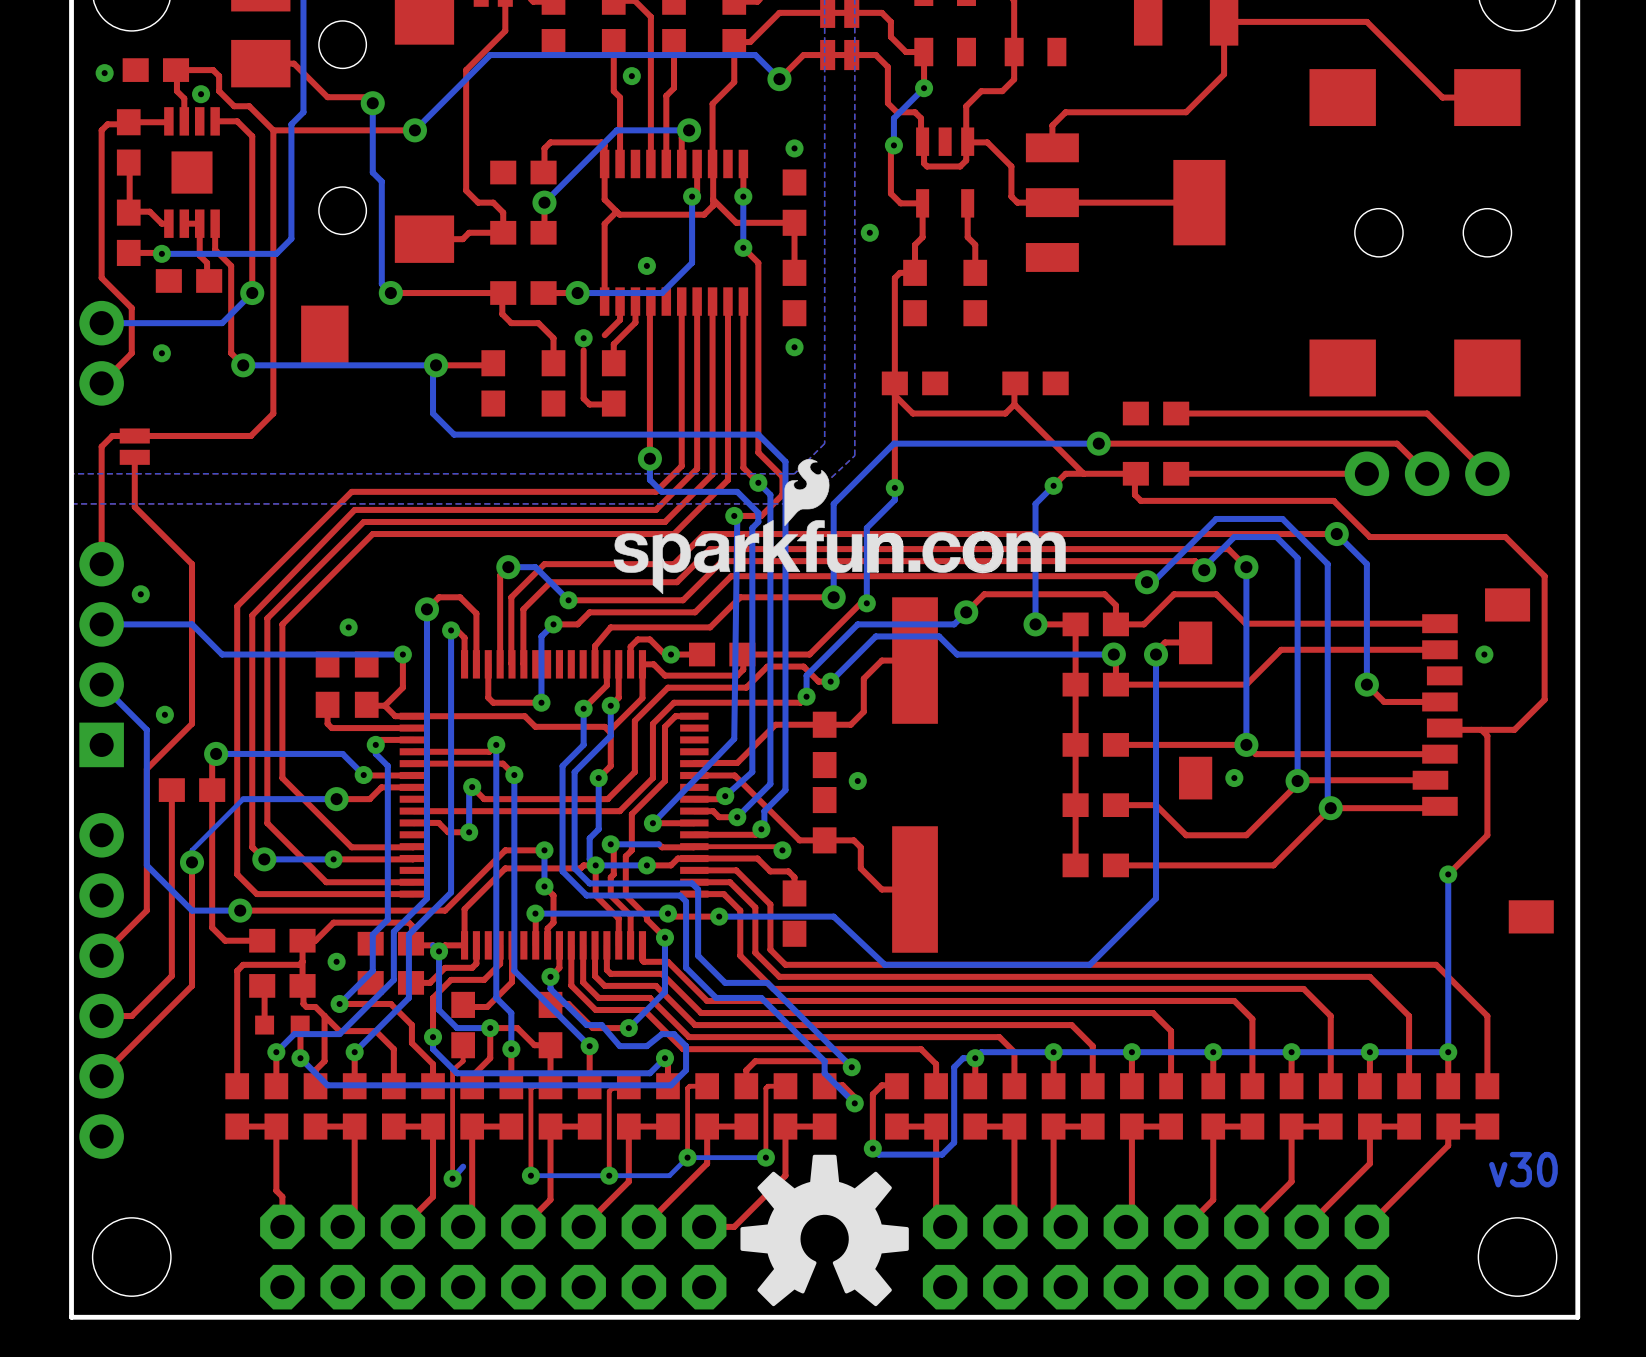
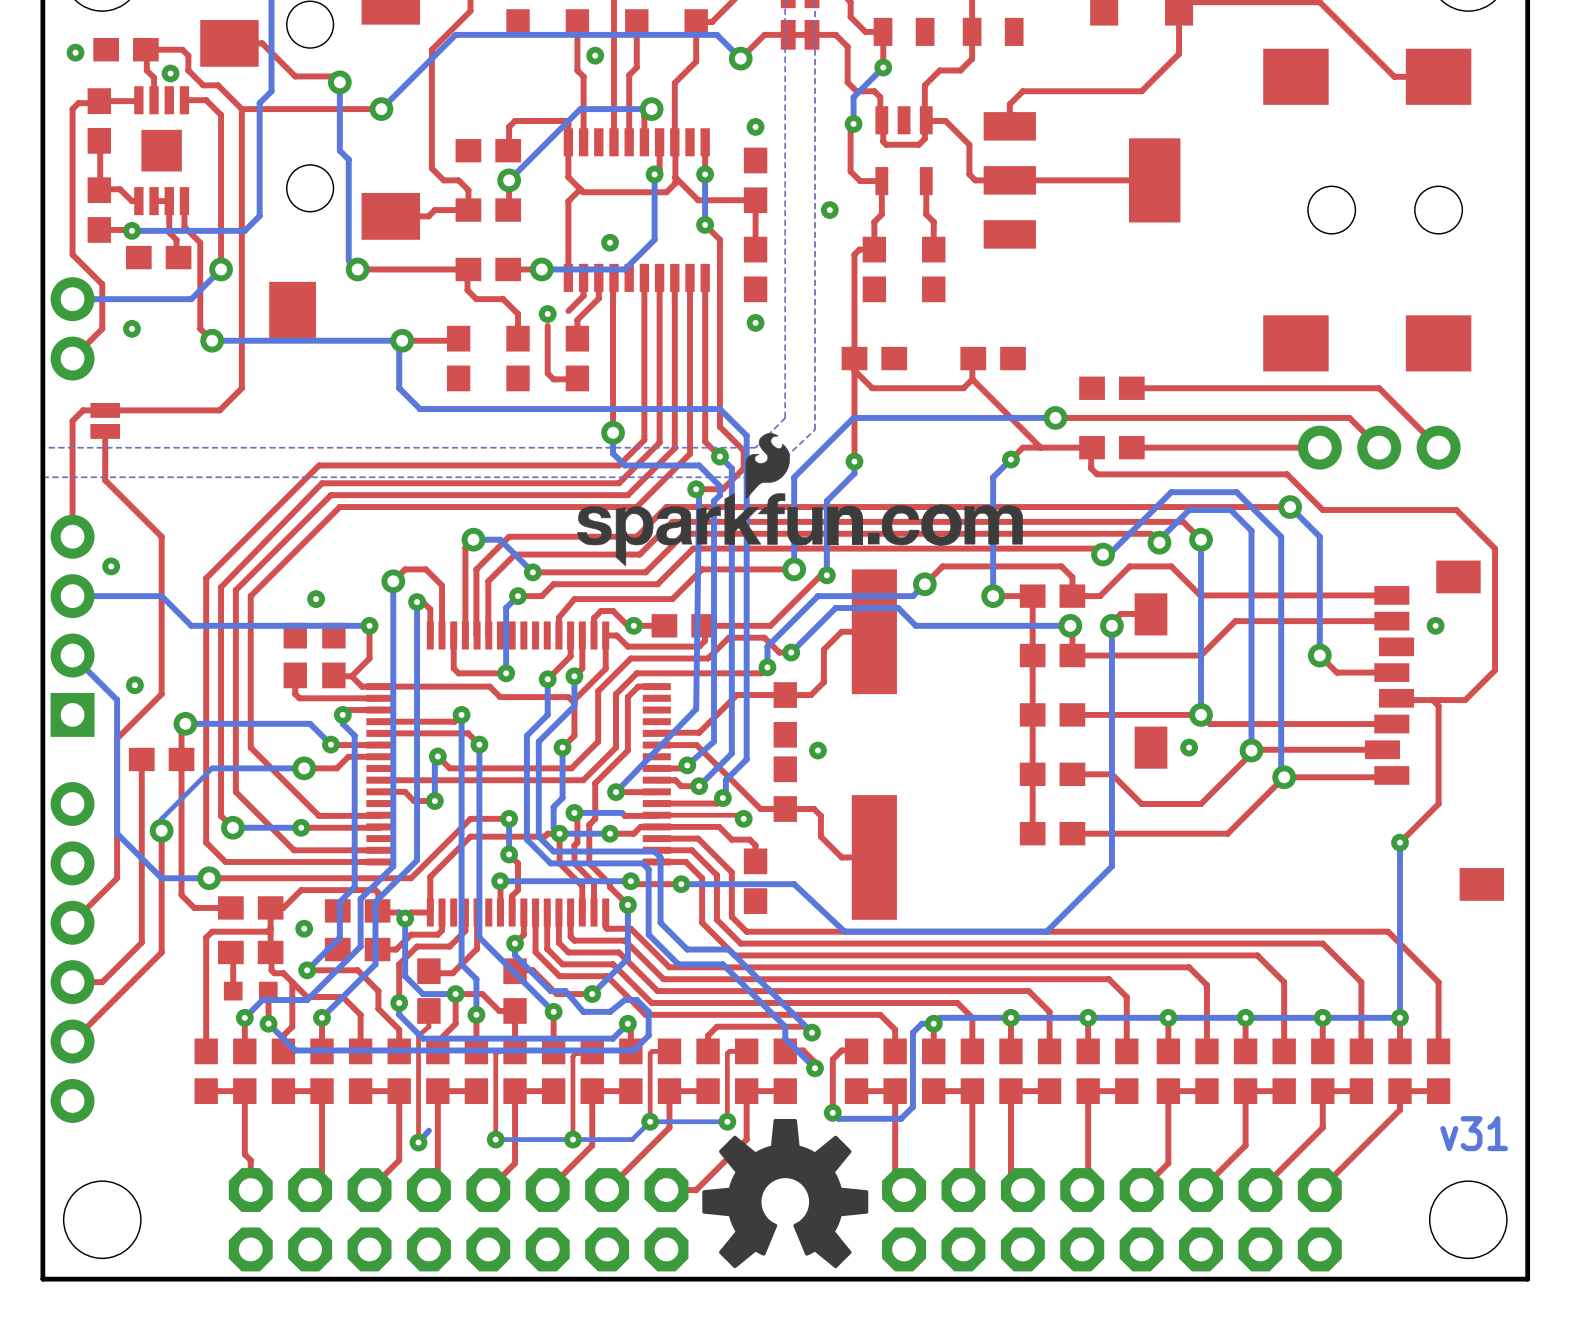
text: v30 (1523, 1169) -> v31 (1474, 1133)

